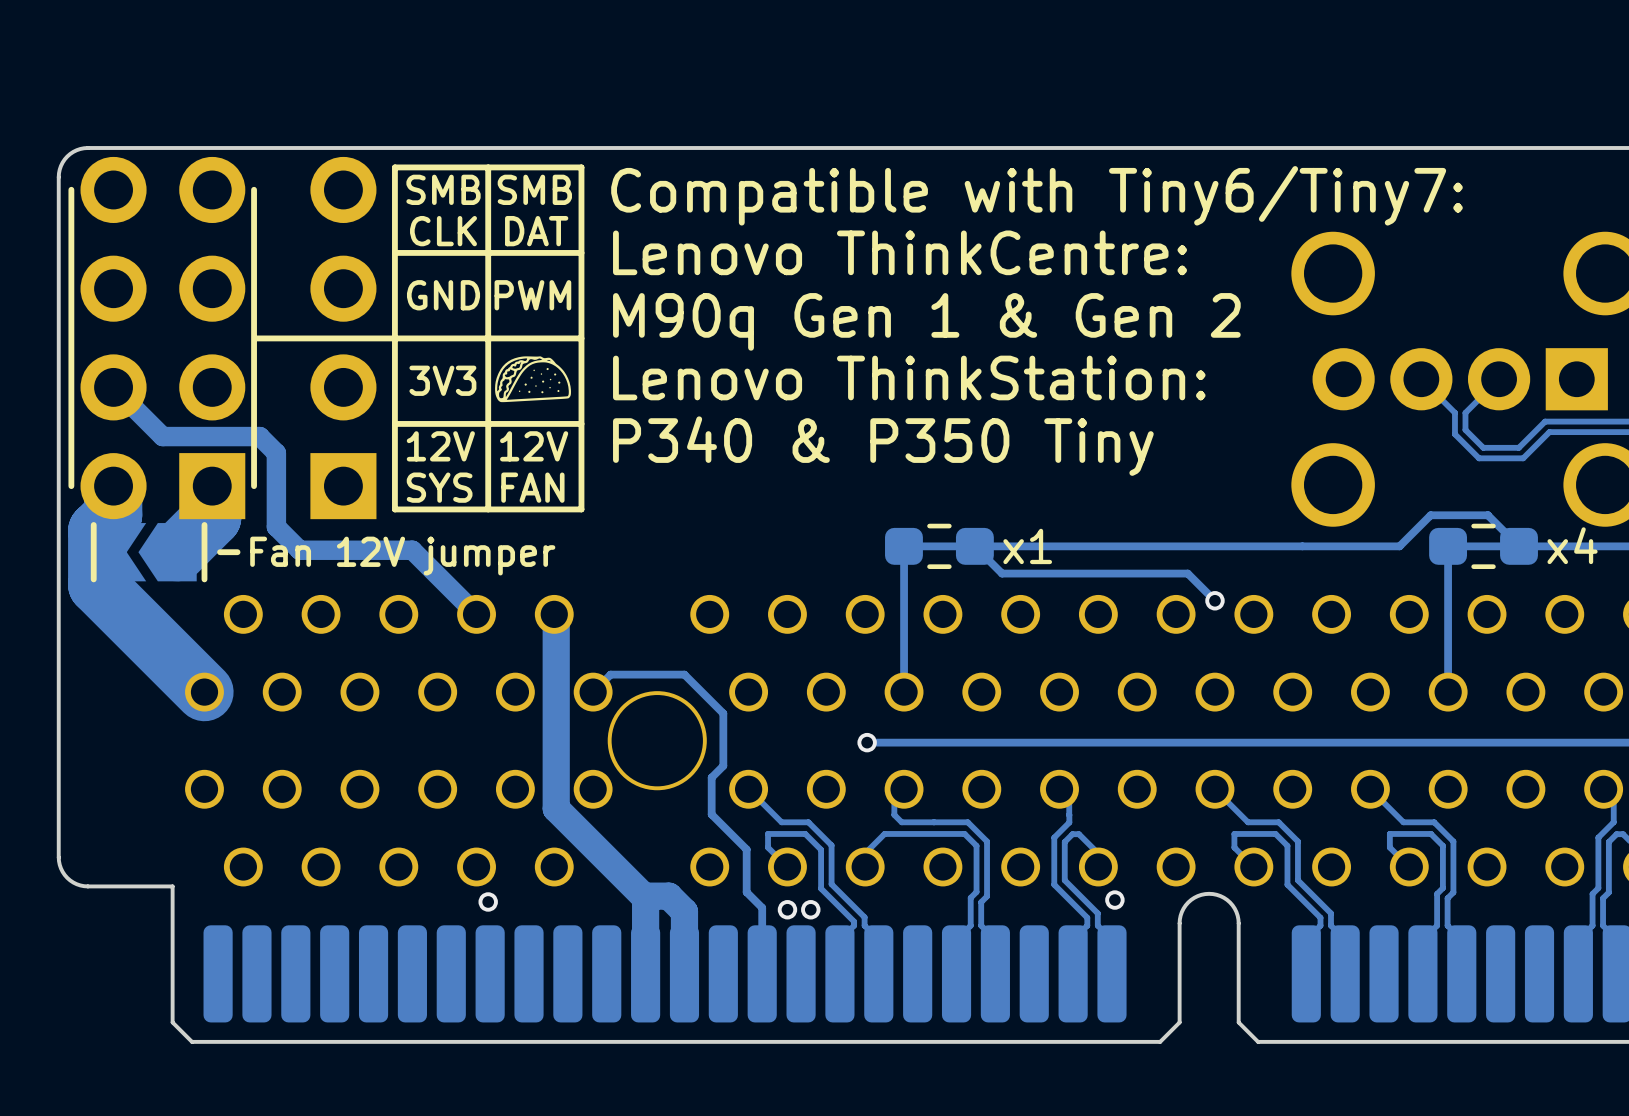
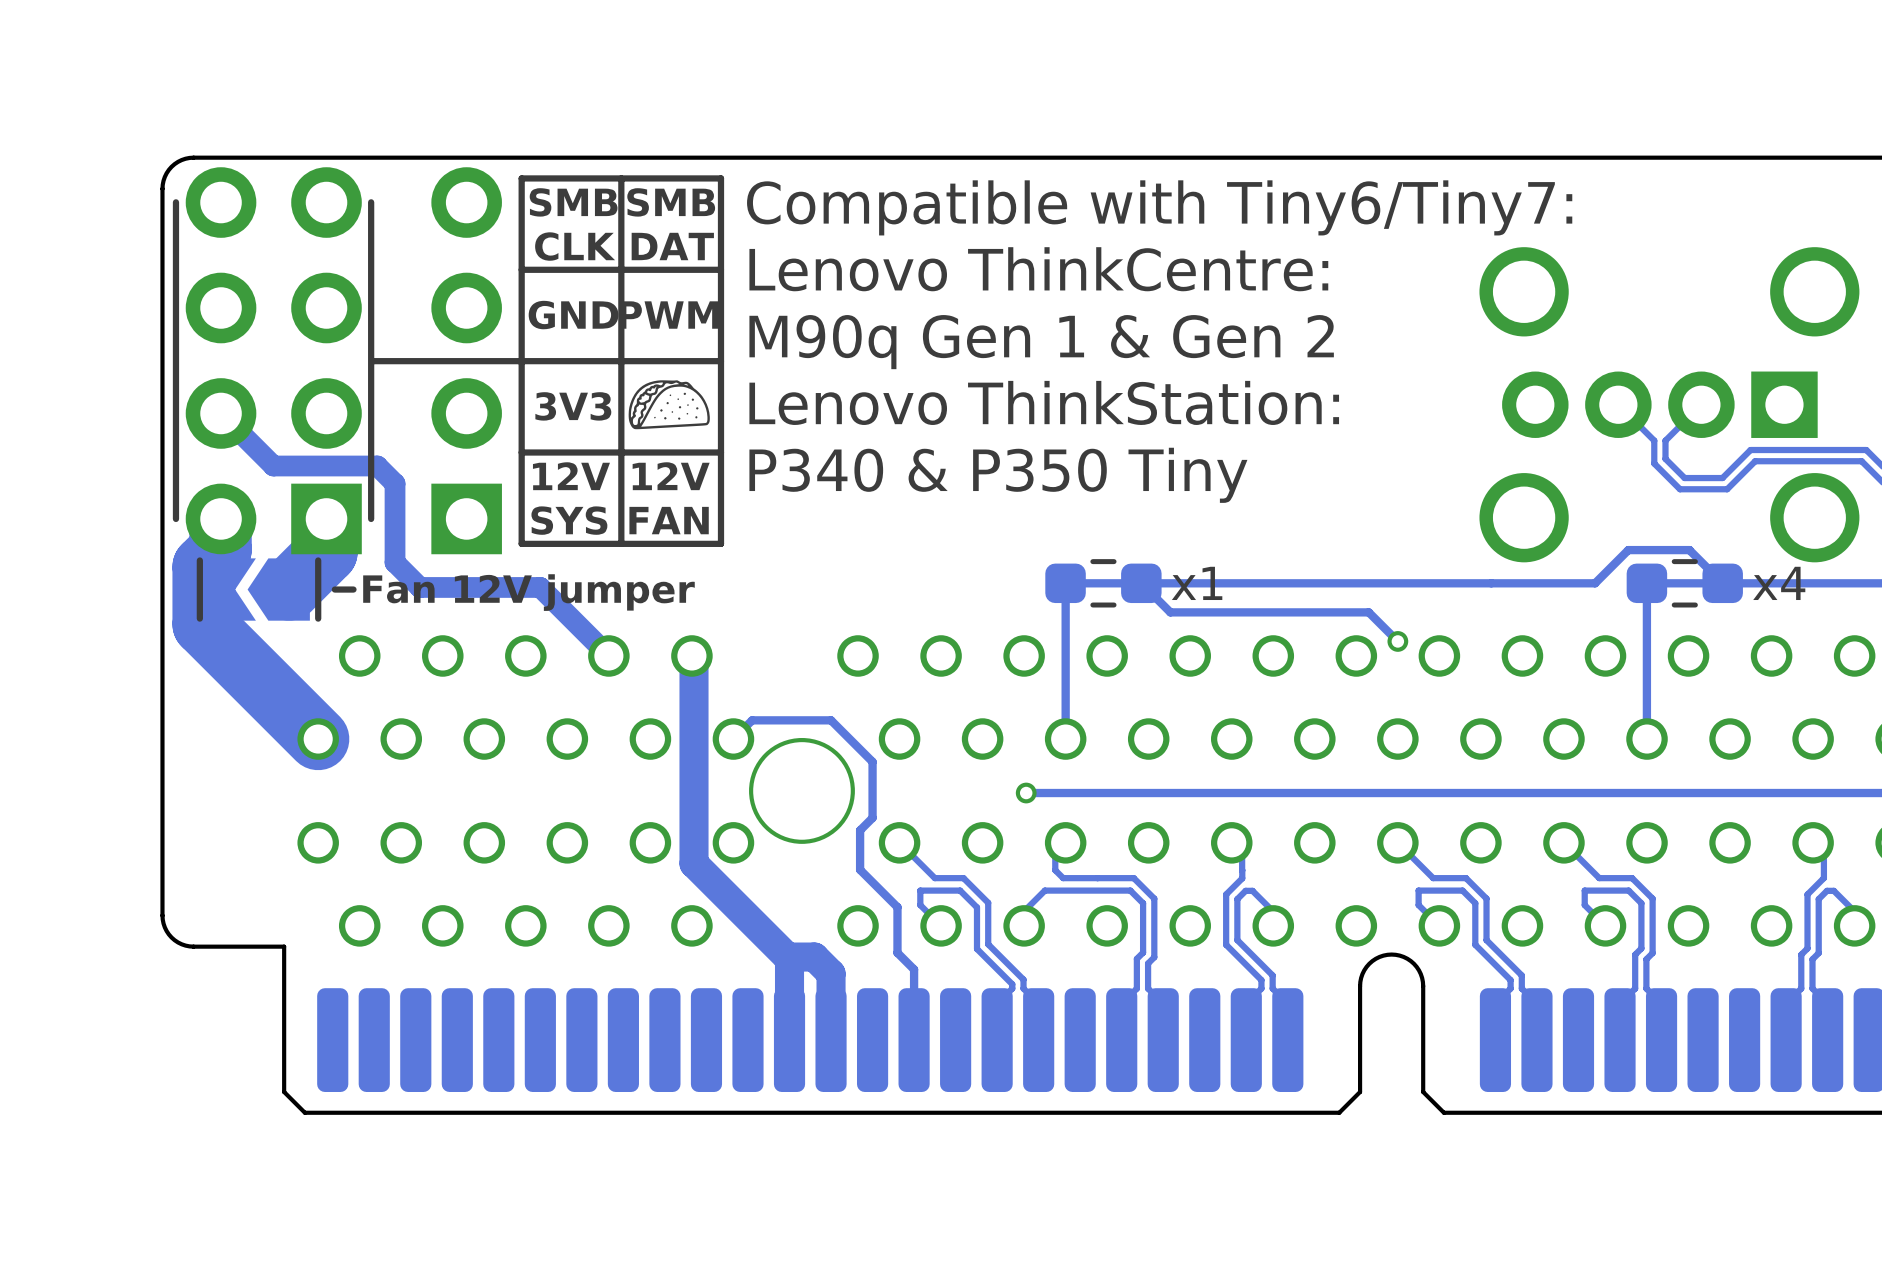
via: (1114, 900) -> none
via: (488, 901) -> none
via: (787, 909) -> none
via: (810, 909) -> none

